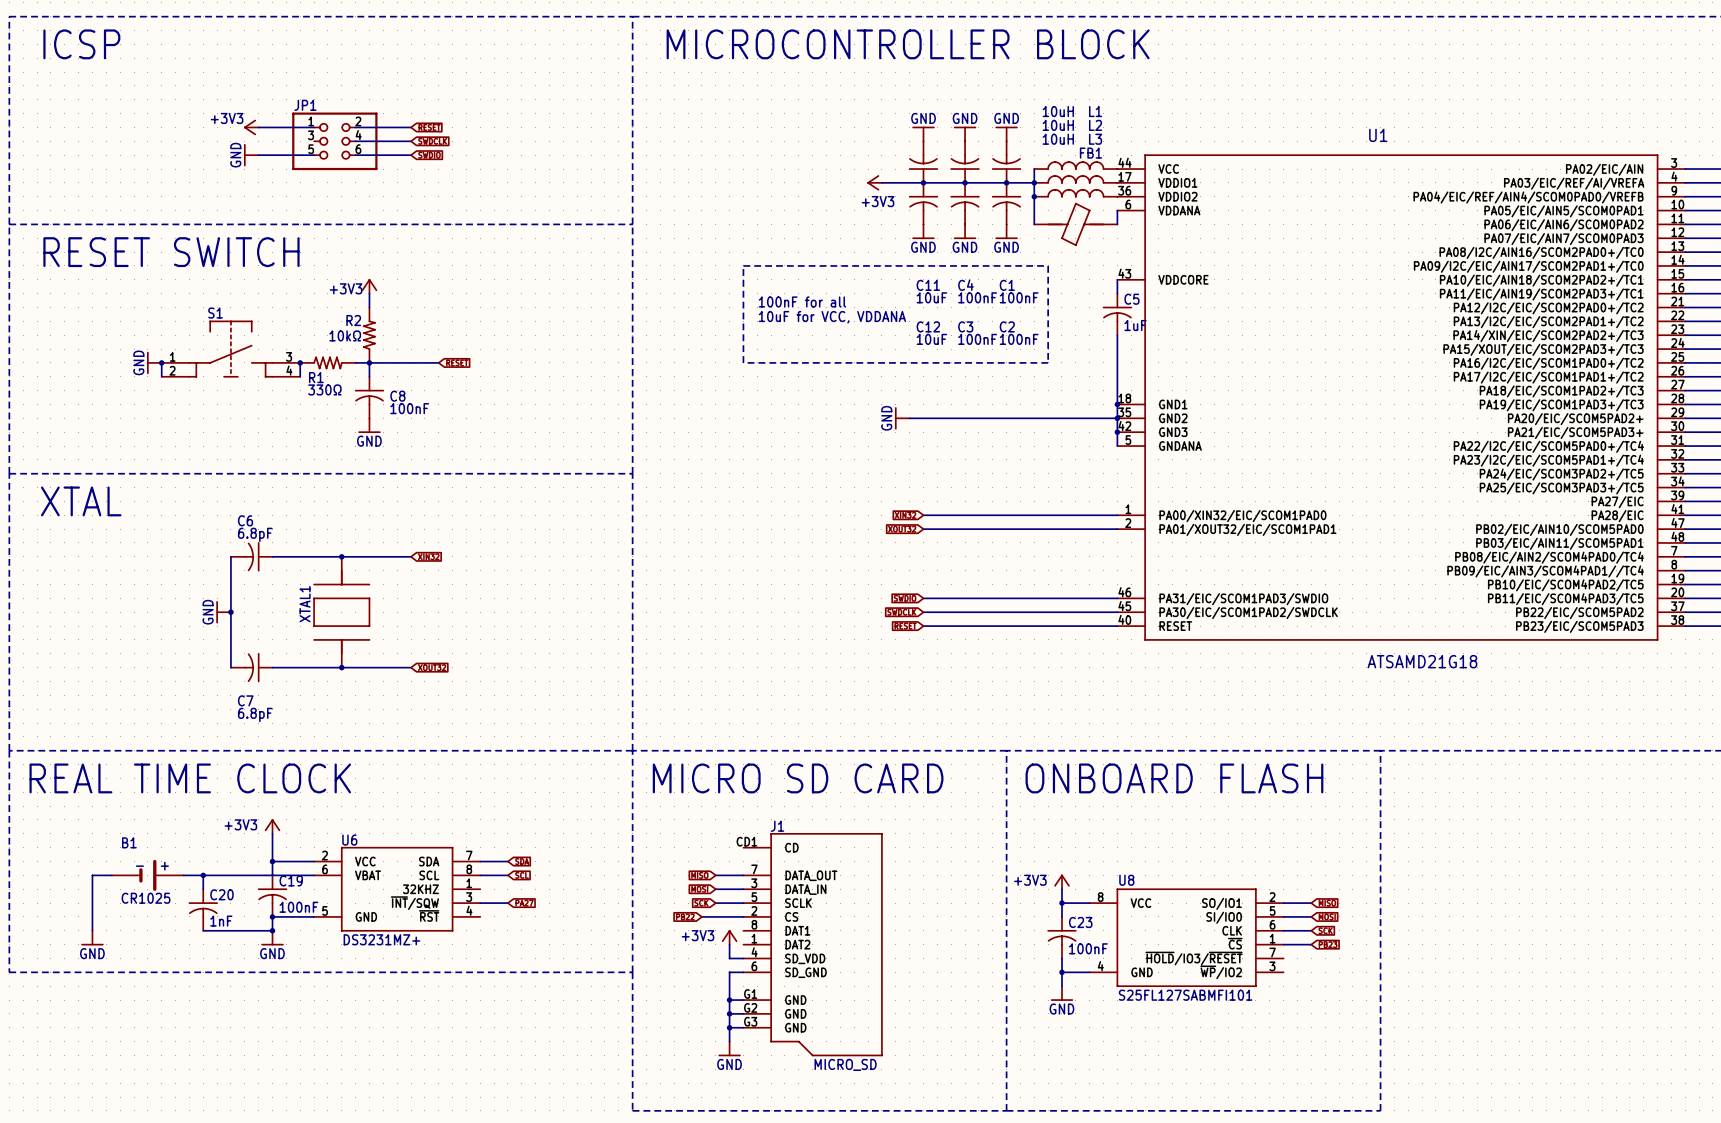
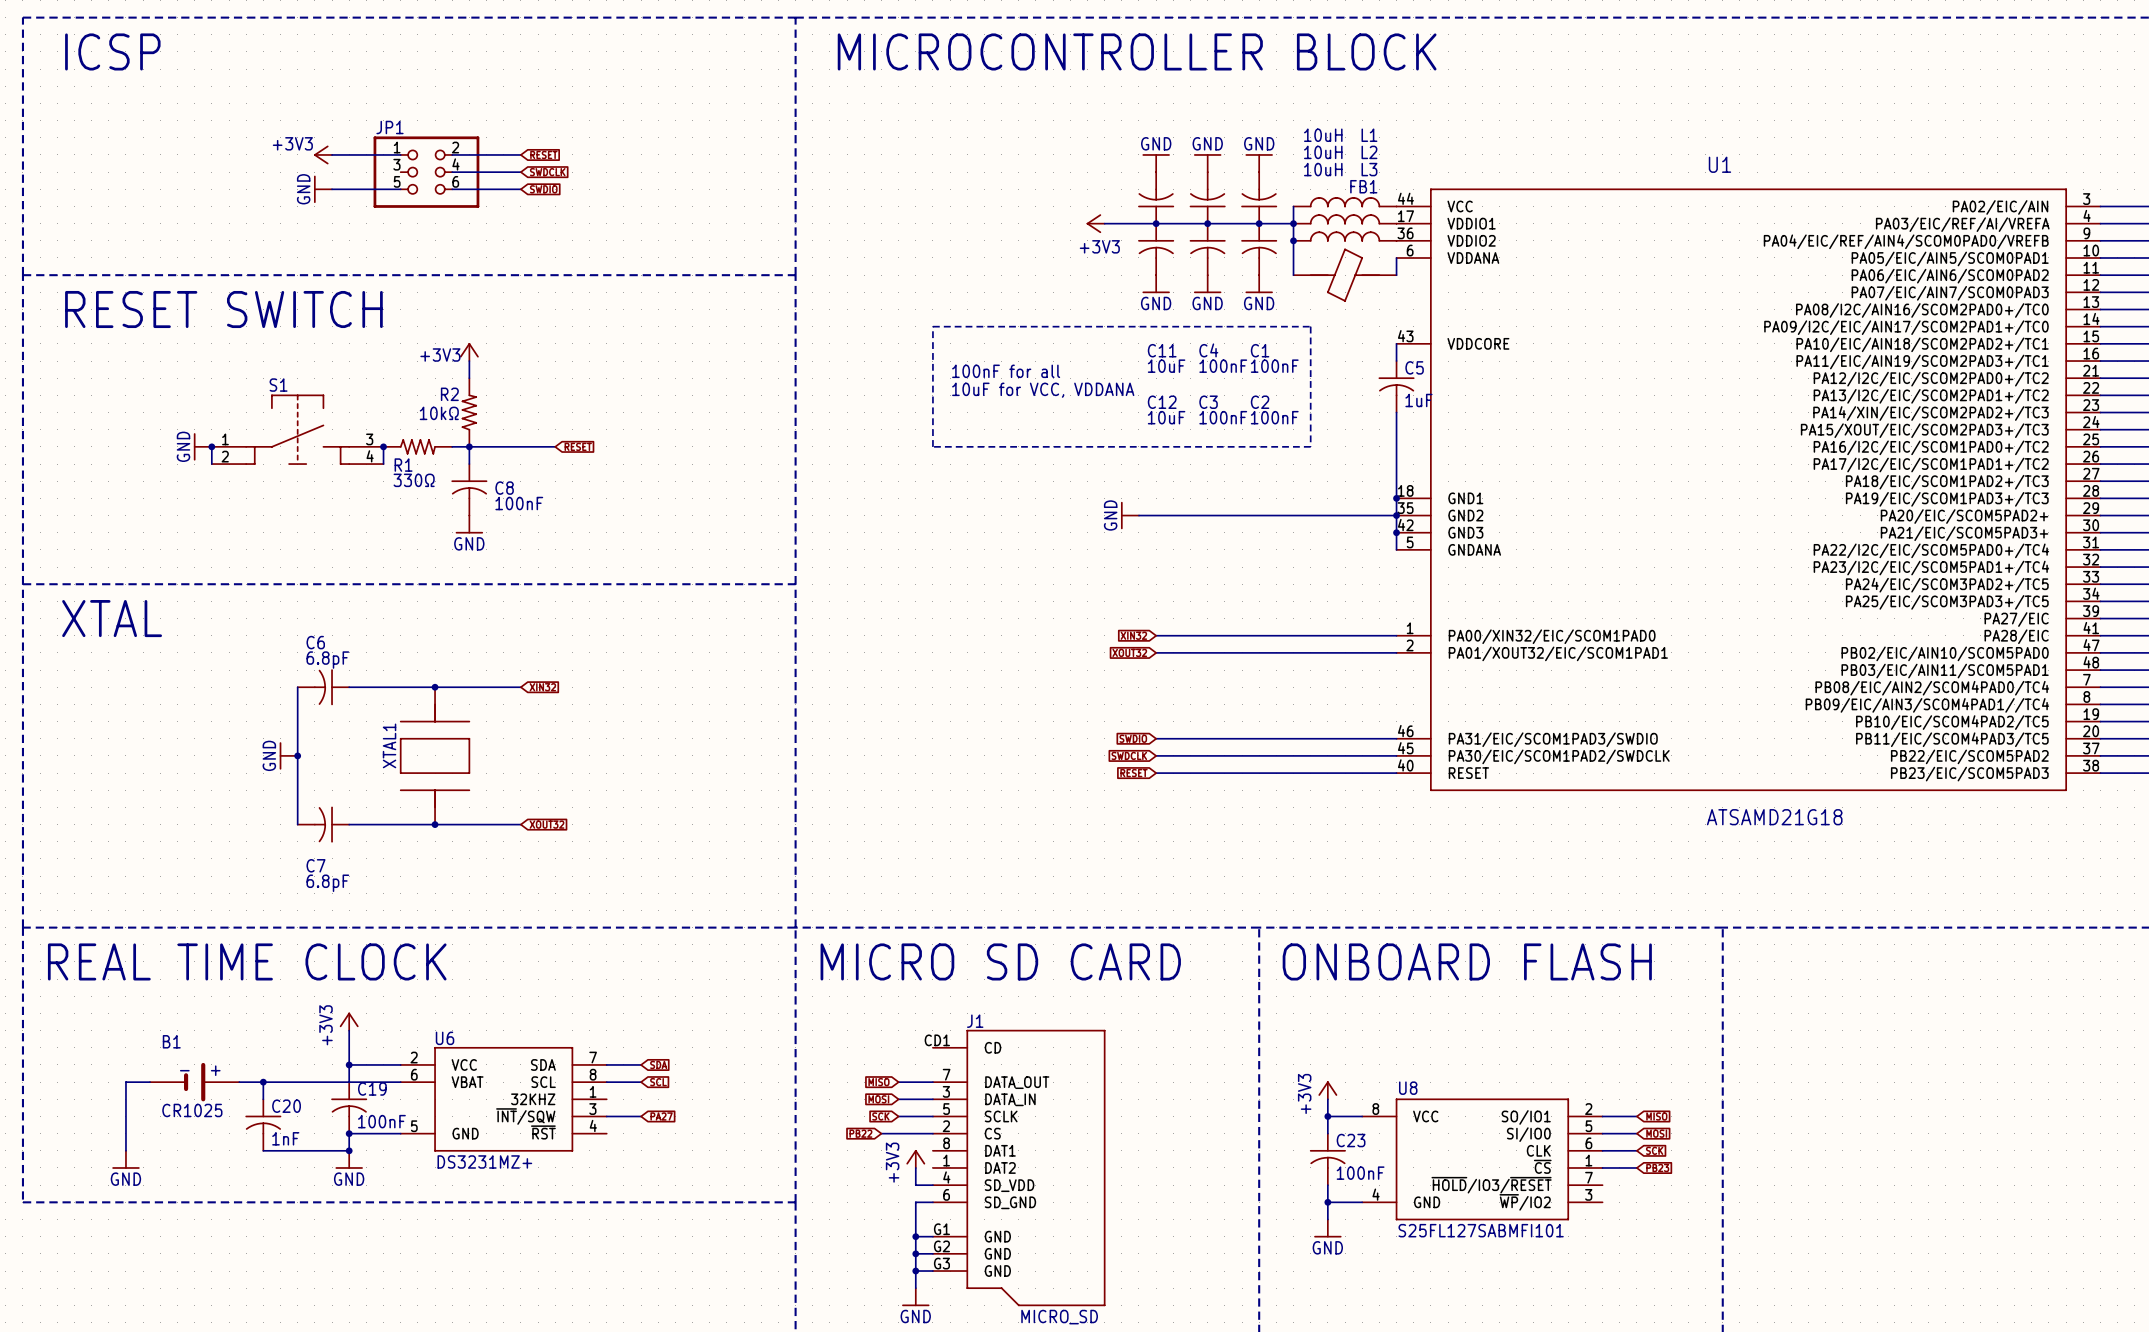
power symbol text rotation: 0° (240, 824) -> 90° counterclockwise (326, 1025)
power symbol text rotation: 0° (1030, 880) -> 90° counterclockwise (1304, 1093)
power symbol text rotation: 0° (697, 935) -> 90° counterclockwise (892, 1162)

